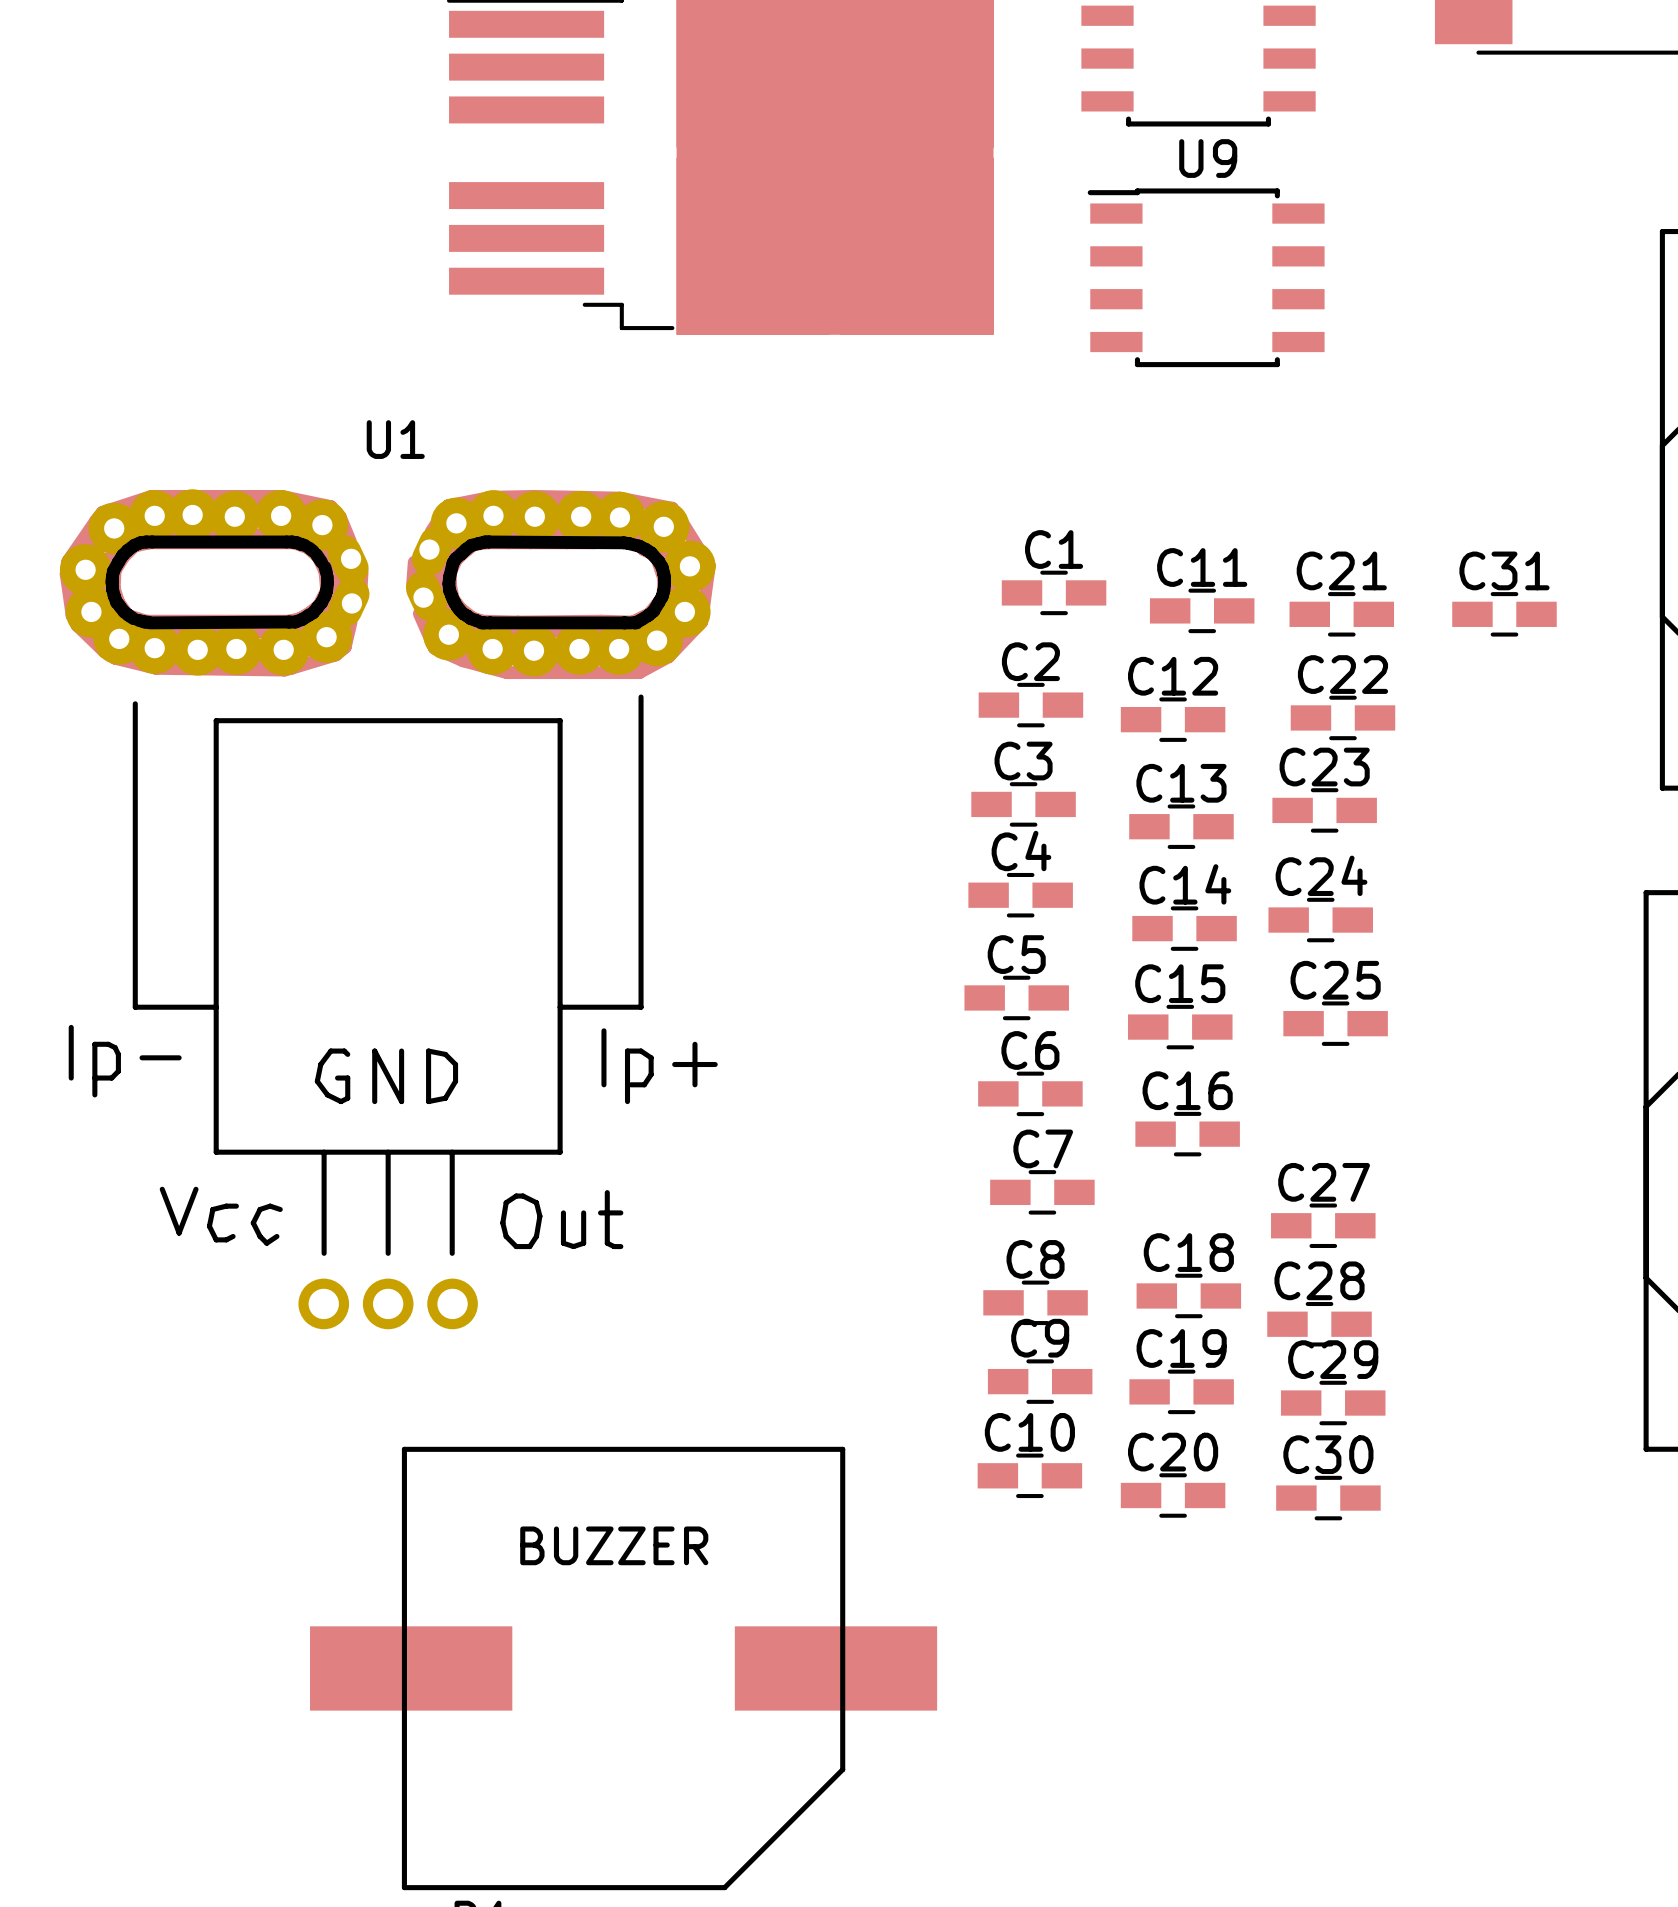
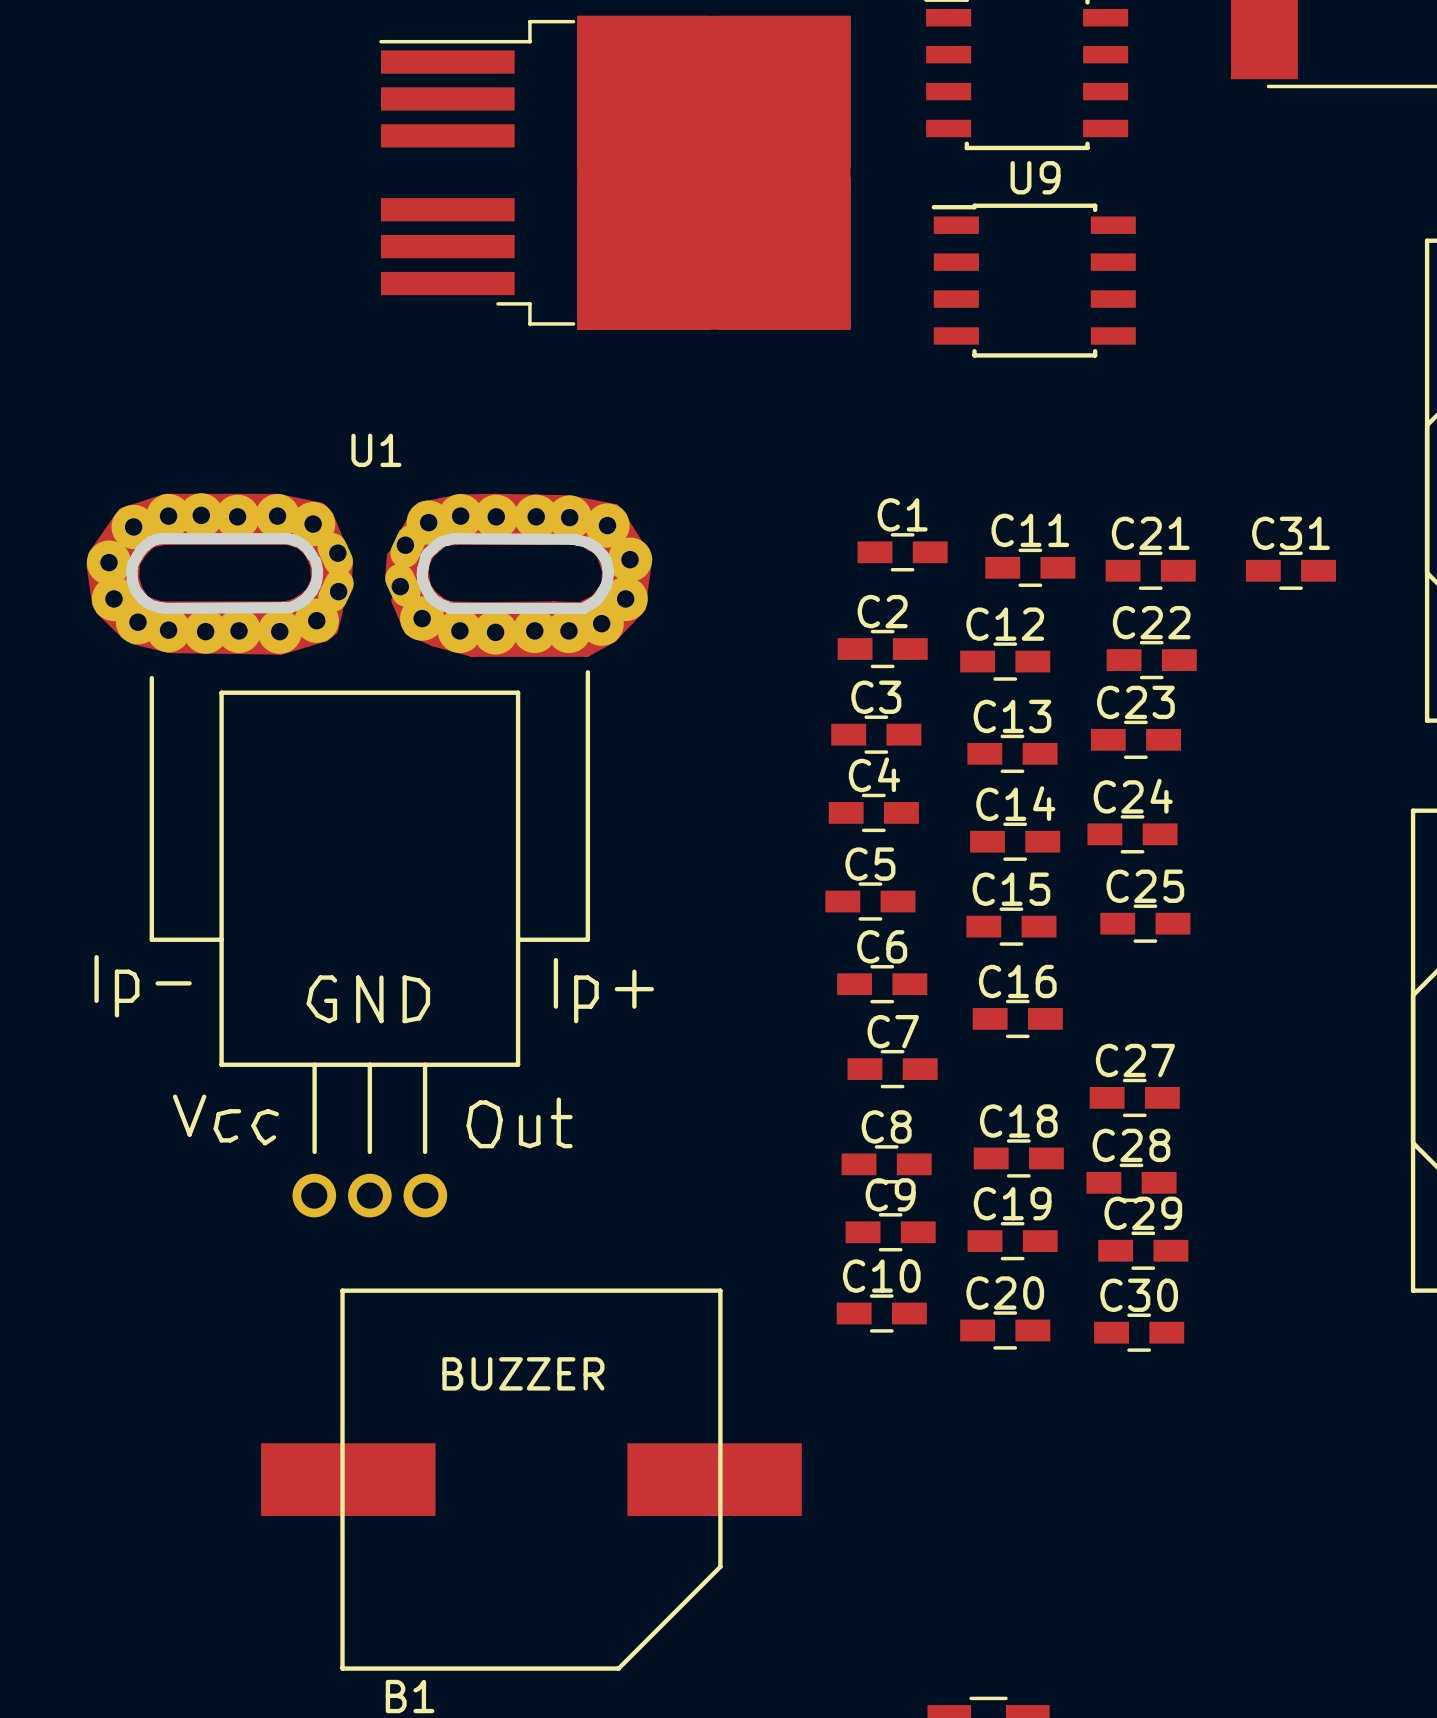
U1 position: (388, 909) -> (370, 855)

